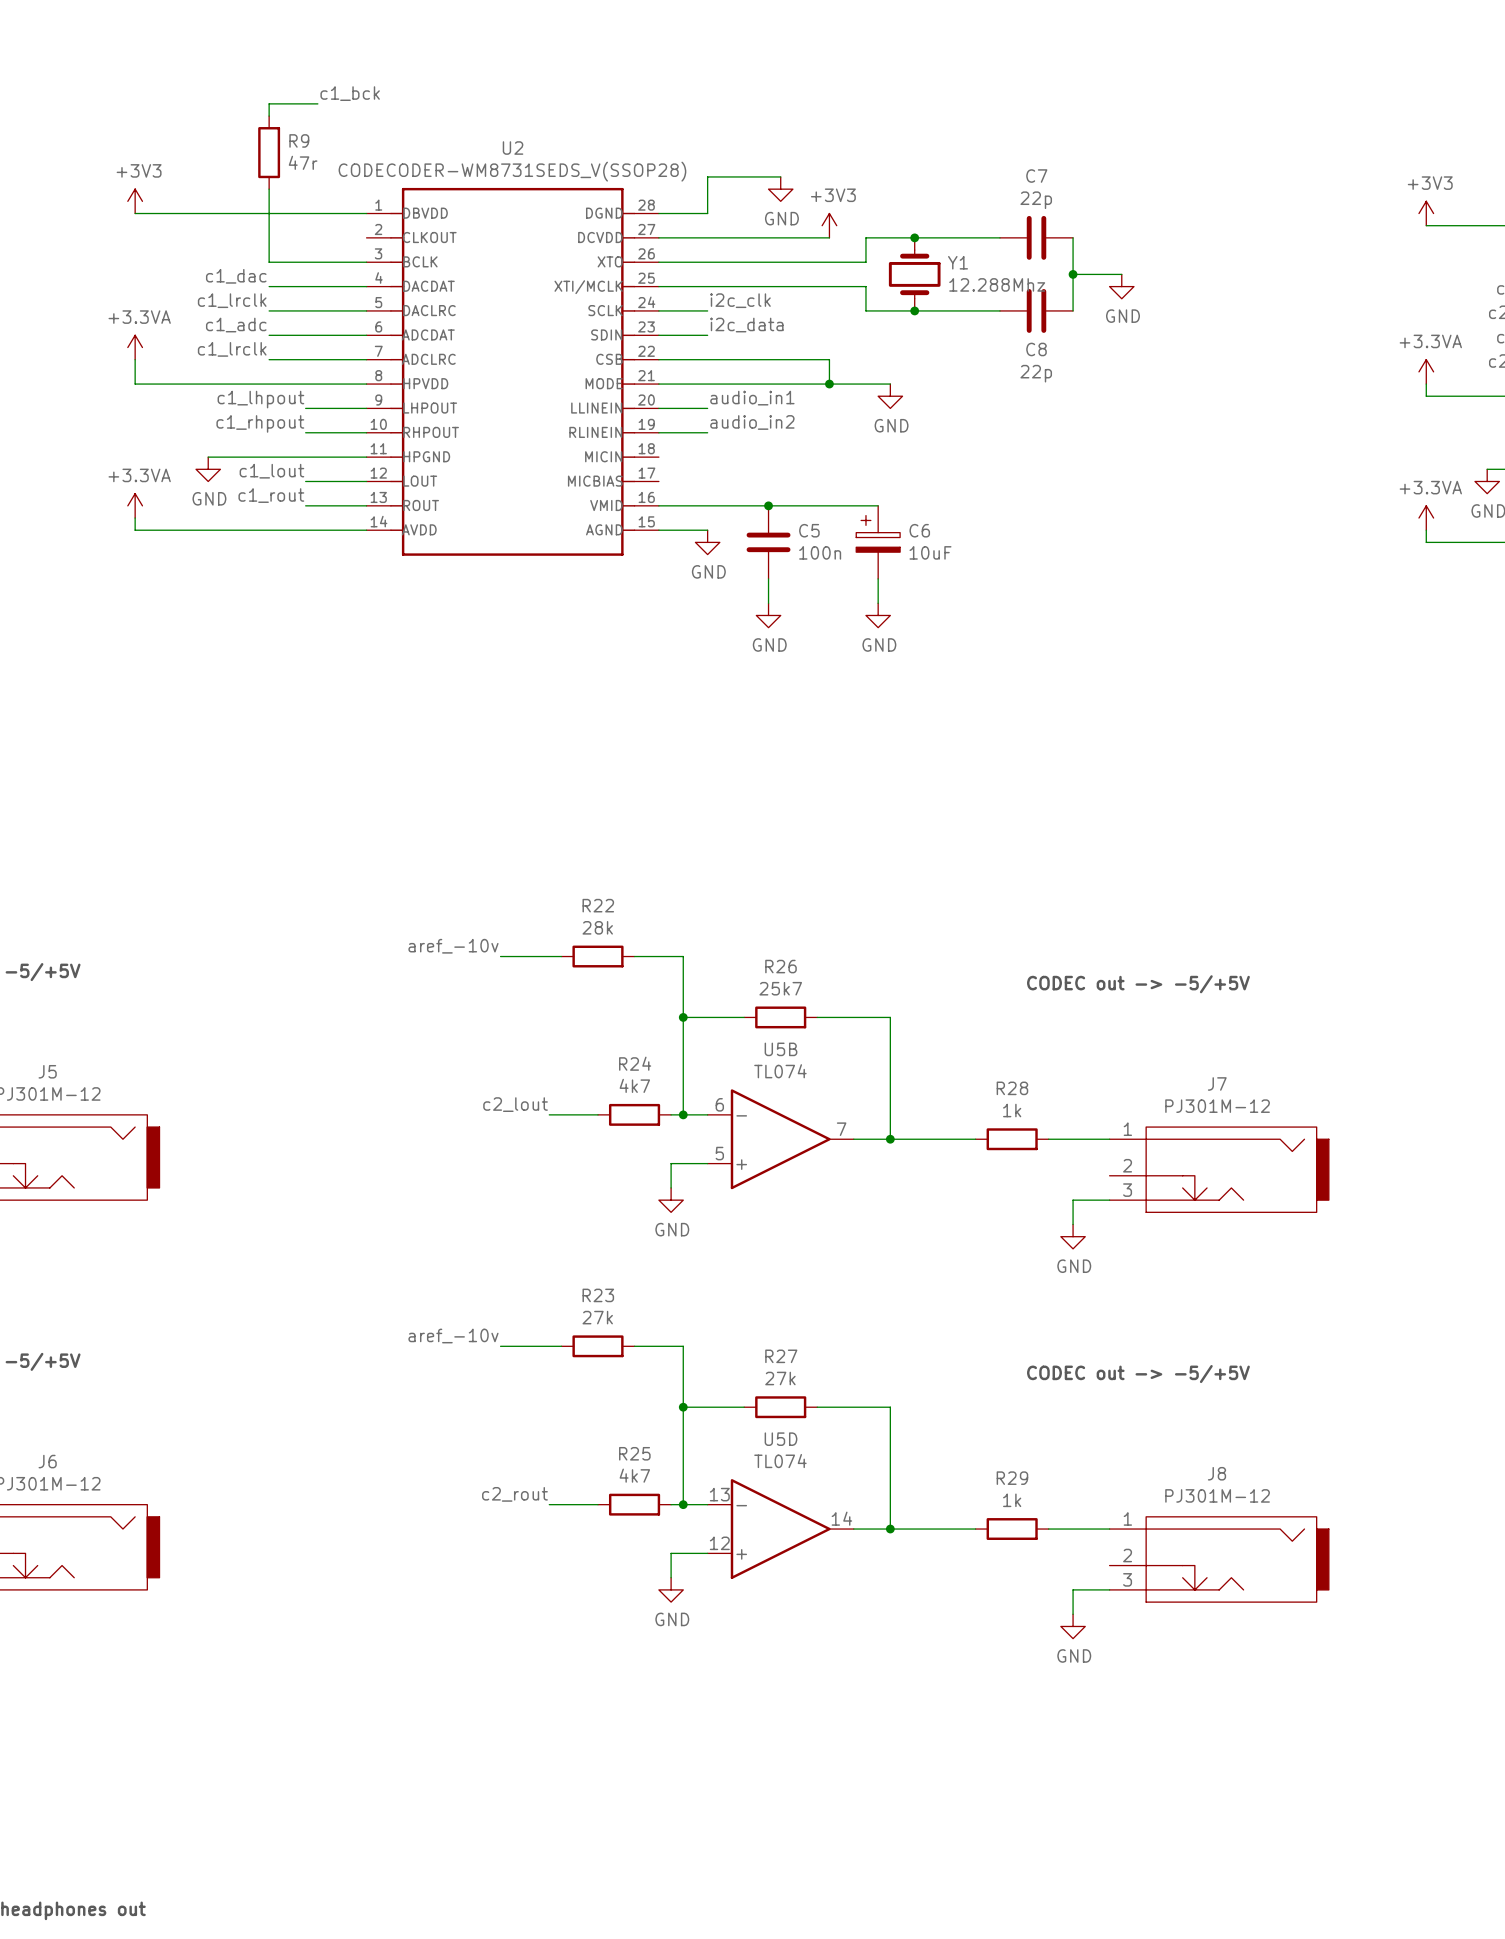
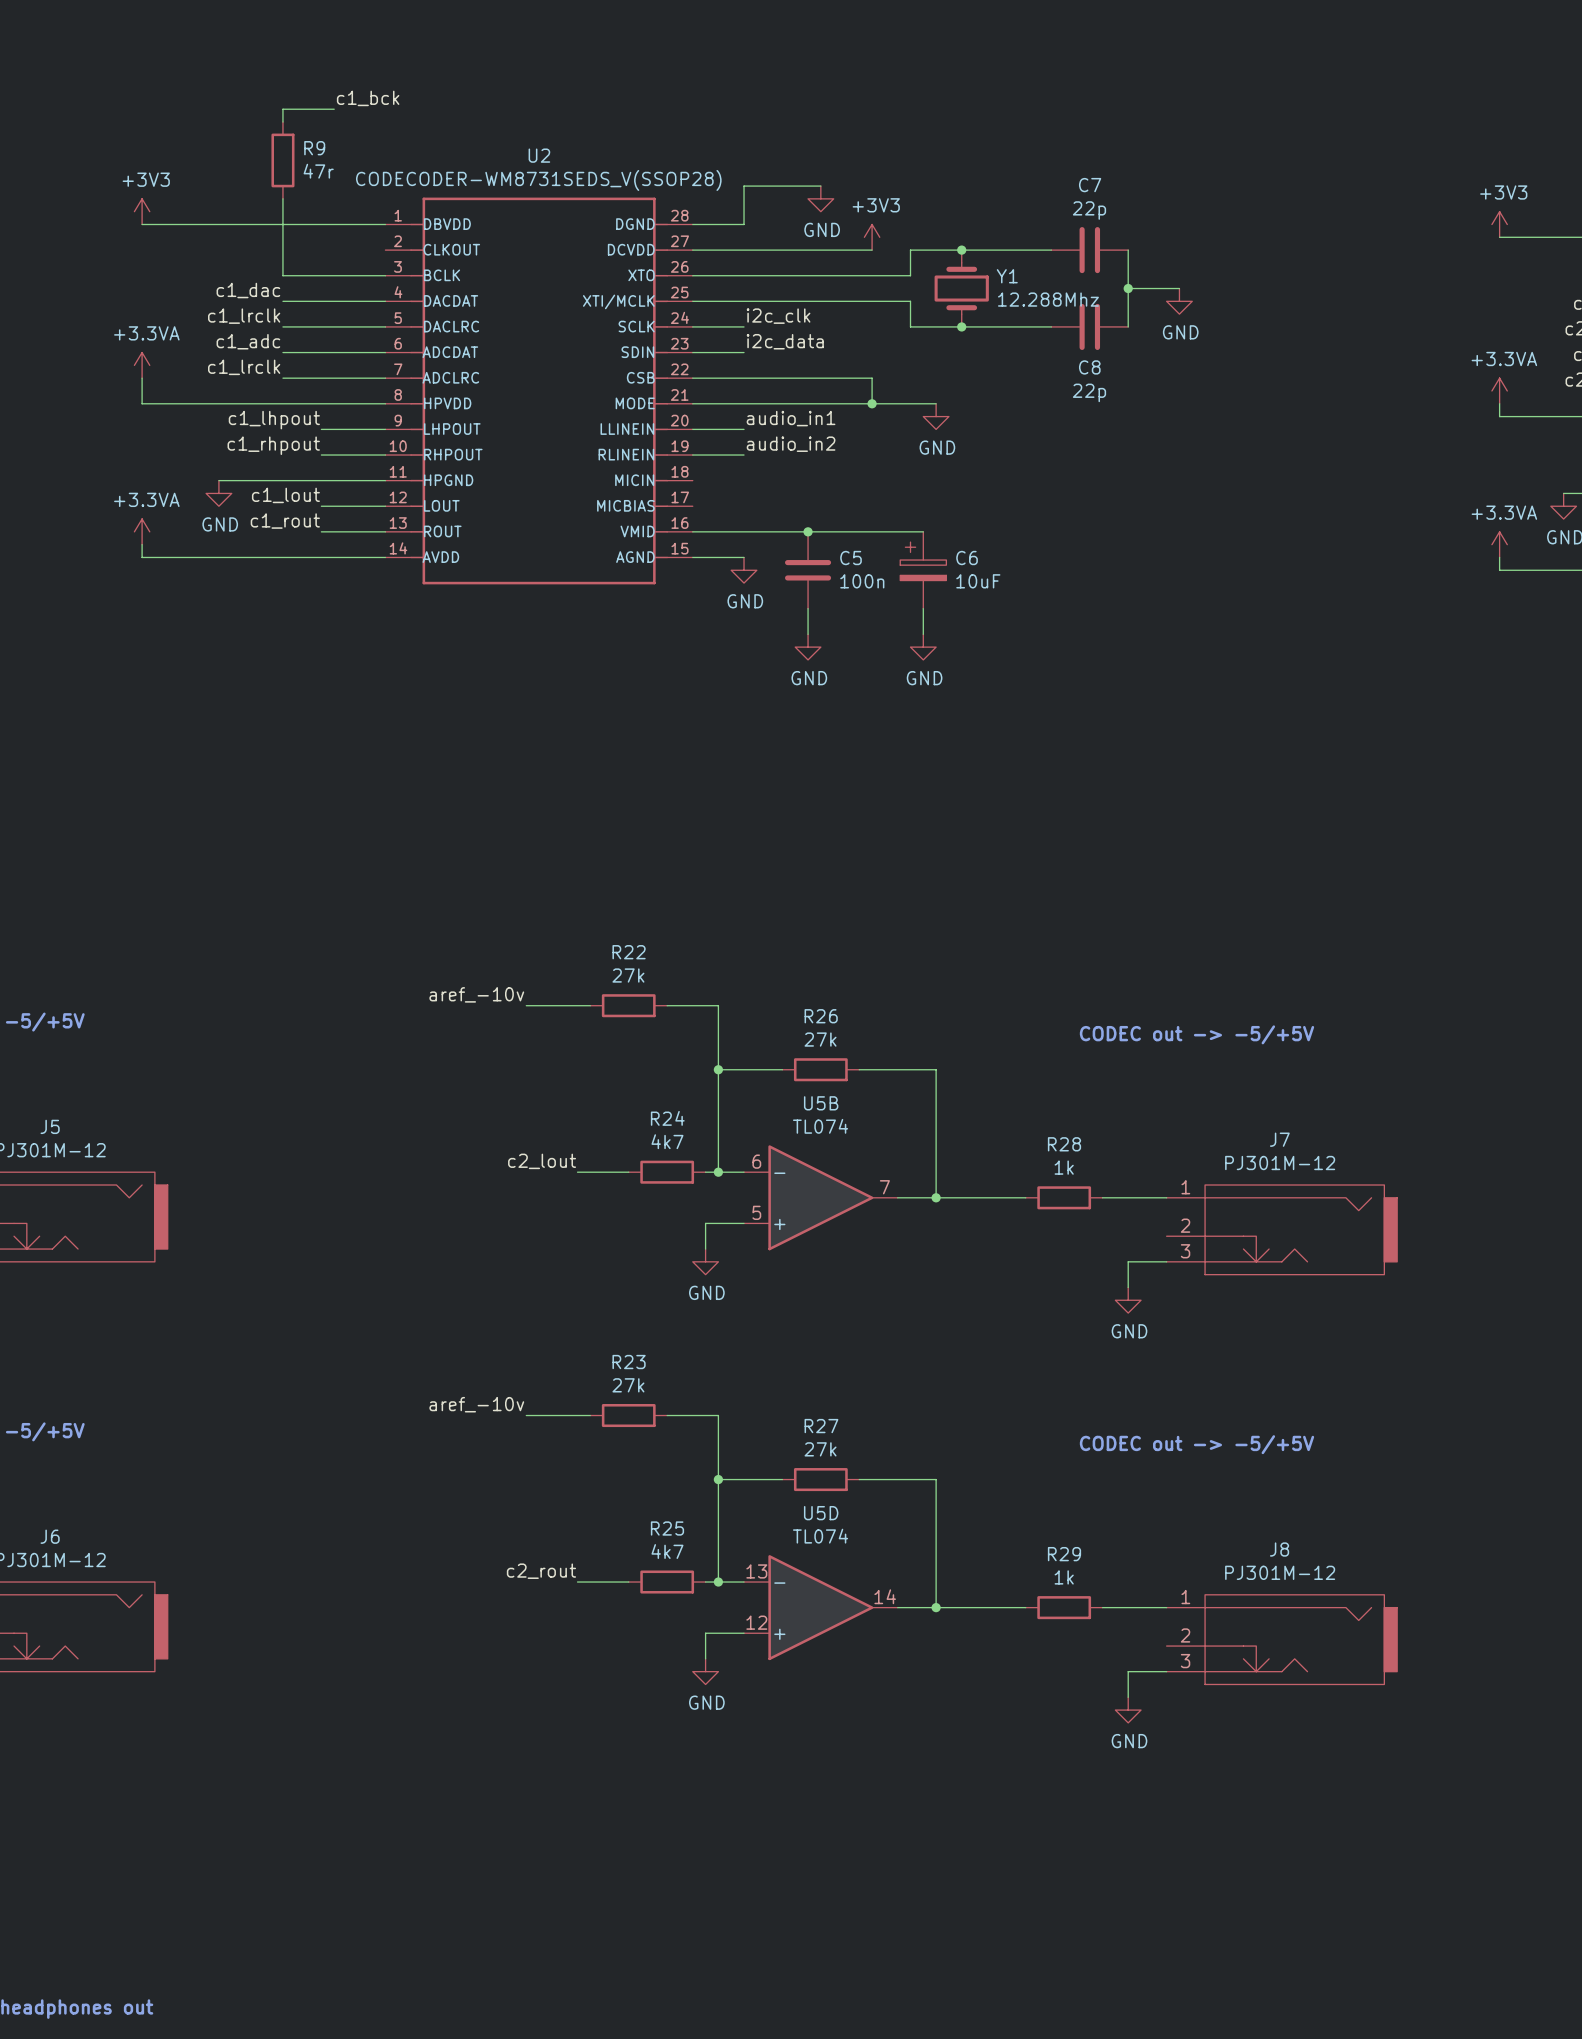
R22 value: 28k (597, 927) -> 27k (628, 975)
R26 value: 25k7 (780, 988) -> 27k (820, 1039)

